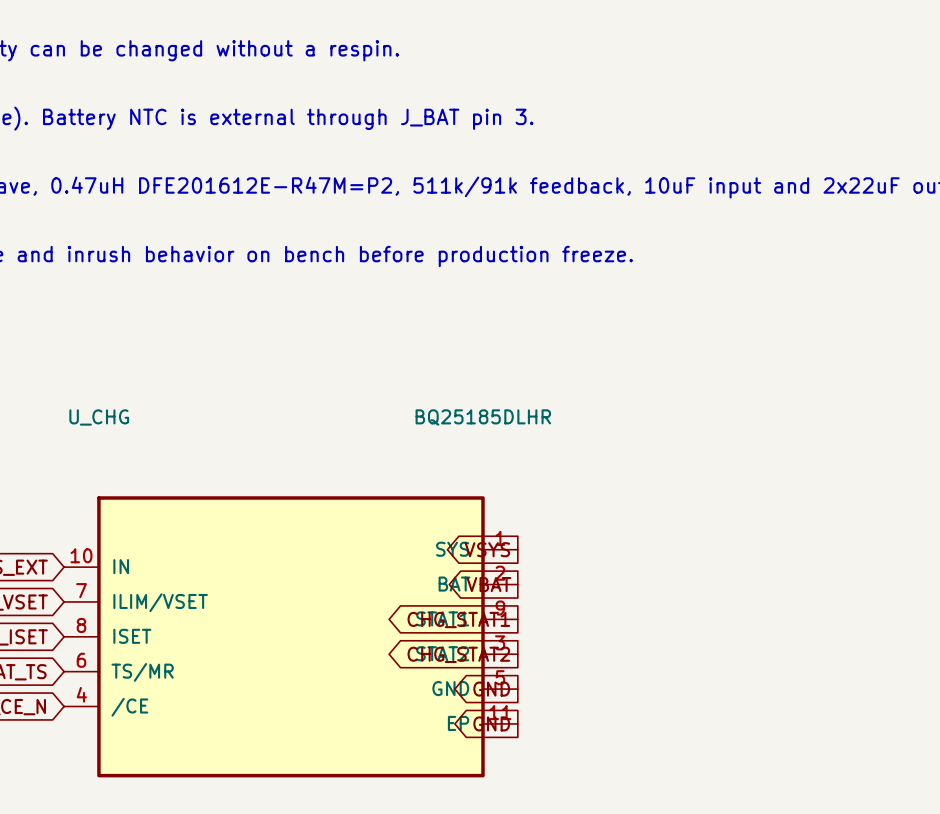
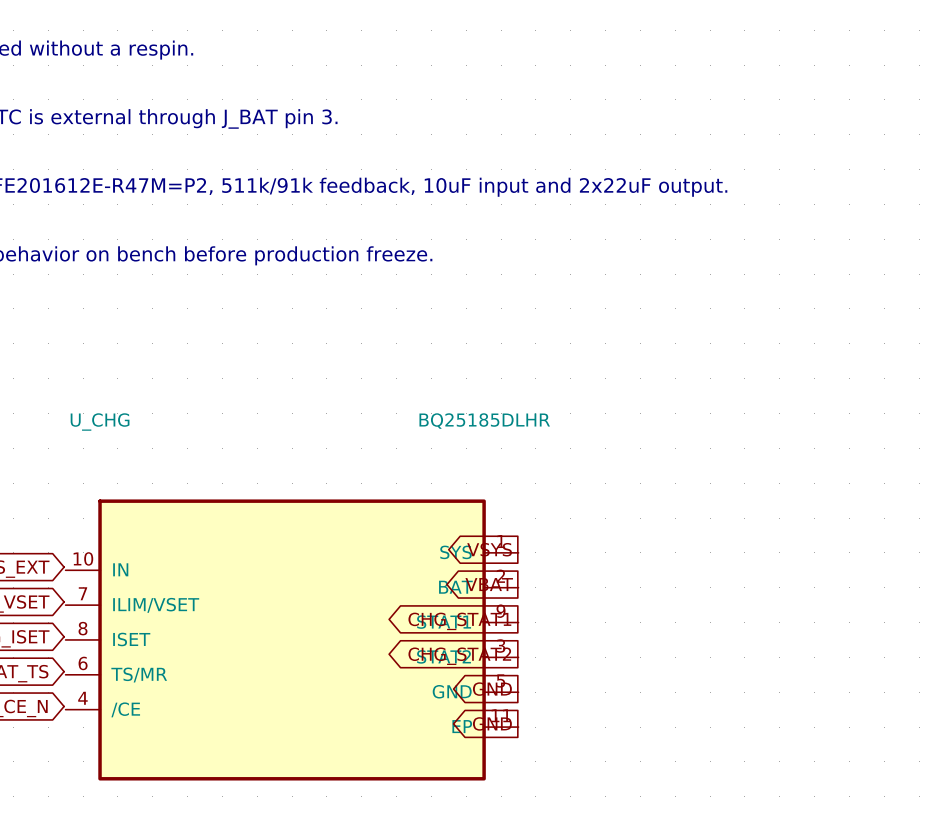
U_CHG symbol: [64, 496, 518, 778] -> [65, 499, 519, 781]

